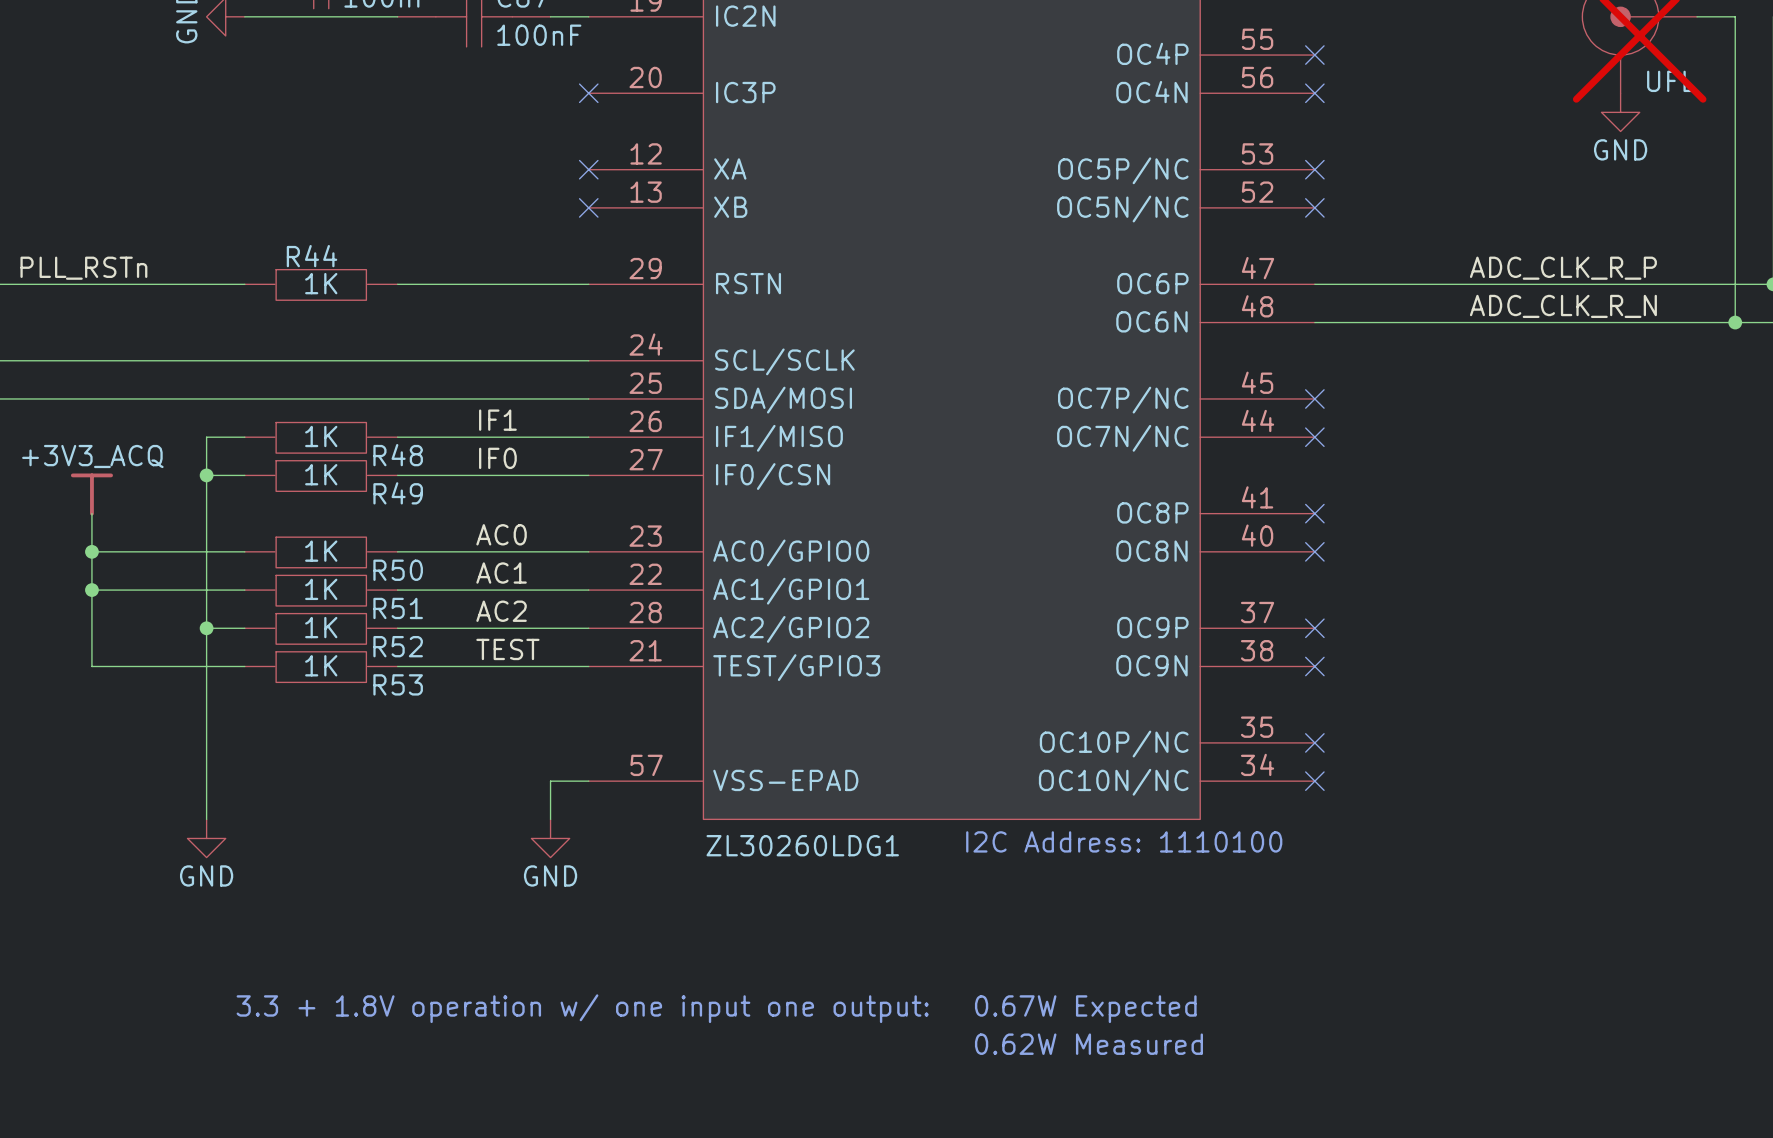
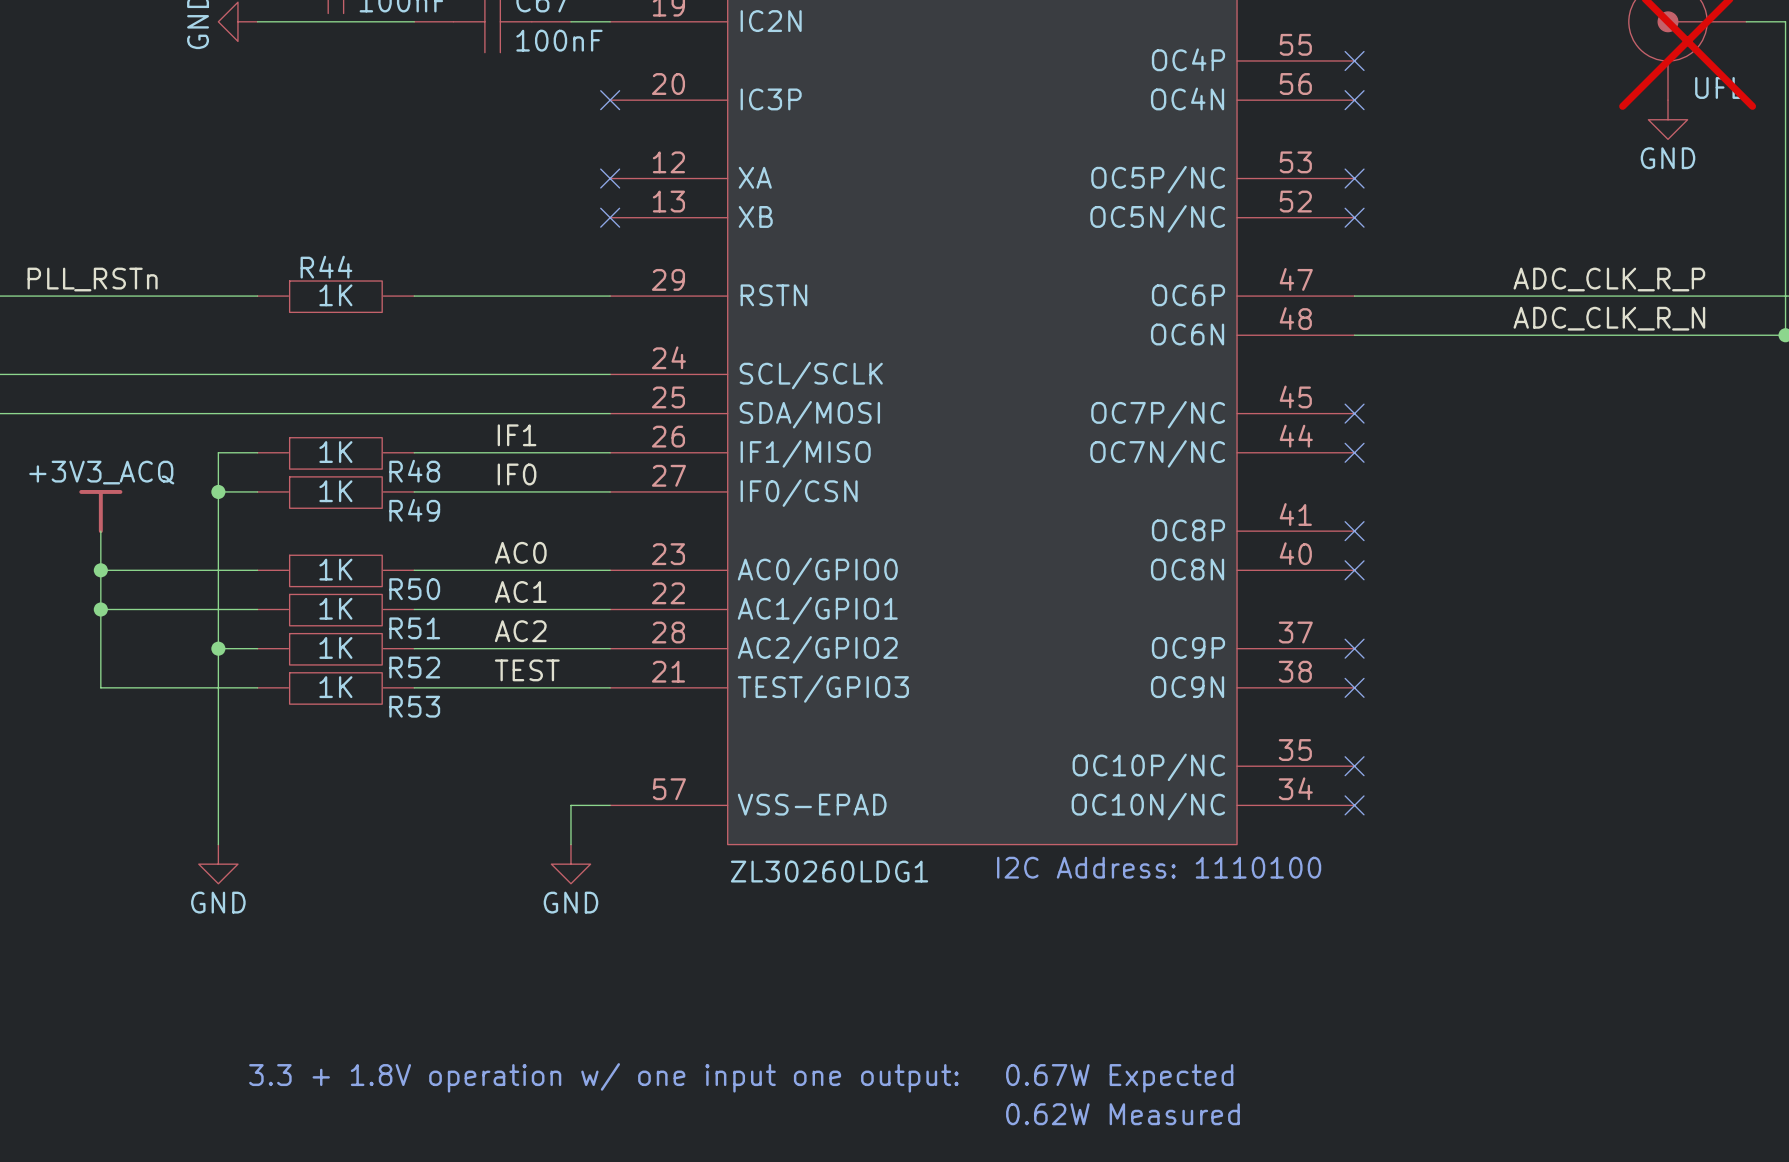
text position: 3.3 + 1.8V operation w/ one input one output: (582, 1008) -> 3.3 + 1.8V operation w/ one input one output: (603, 1077)
text: 0.67W Expected (1085, 1009) -> none
text: 0.62W Measured (1088, 1044) -> 0.67W Expected (1119, 1078)
text: none -> 0.62W Measured (1122, 1114)

